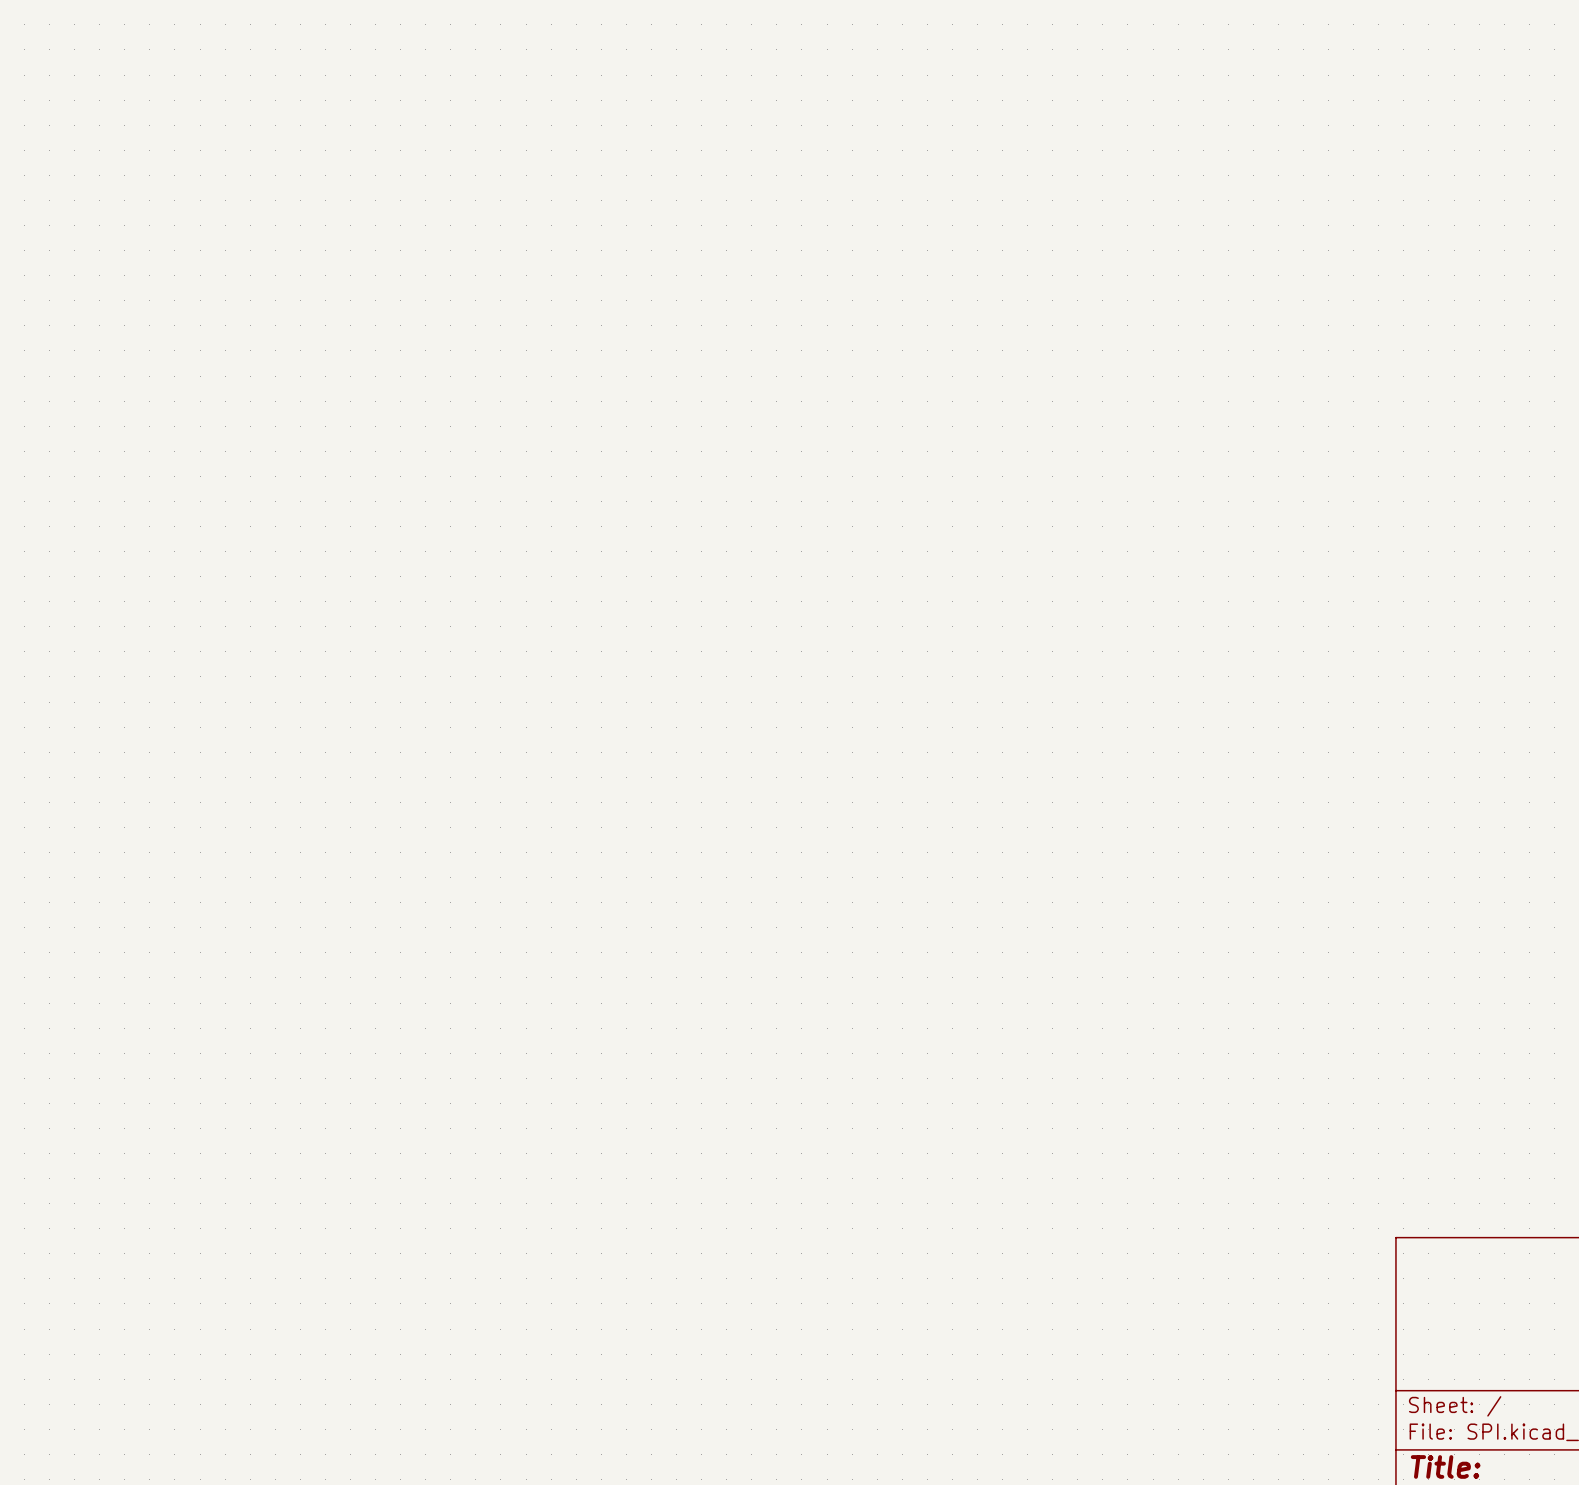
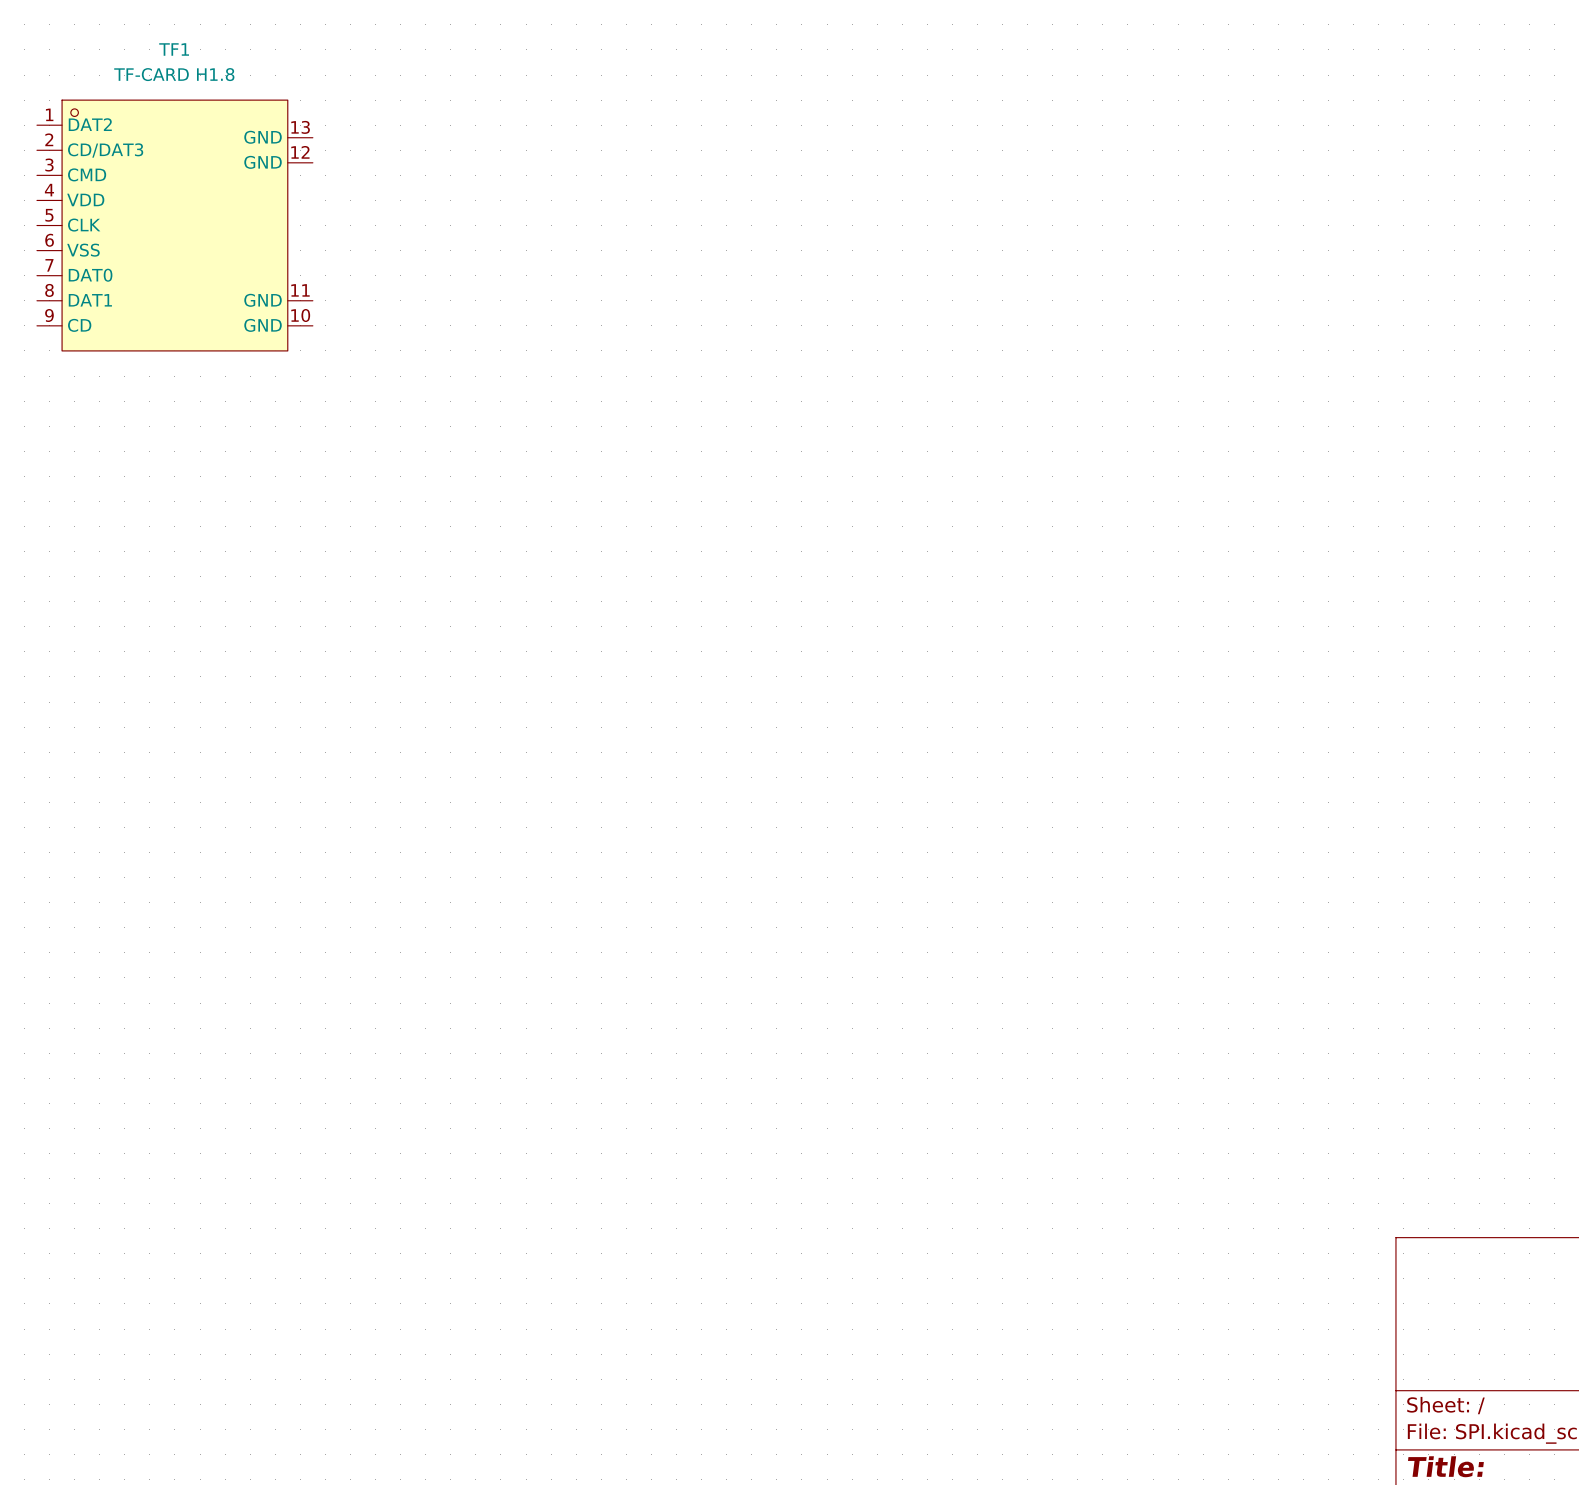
TF1: none -> TF-CARD H1.8 (174, 225)

